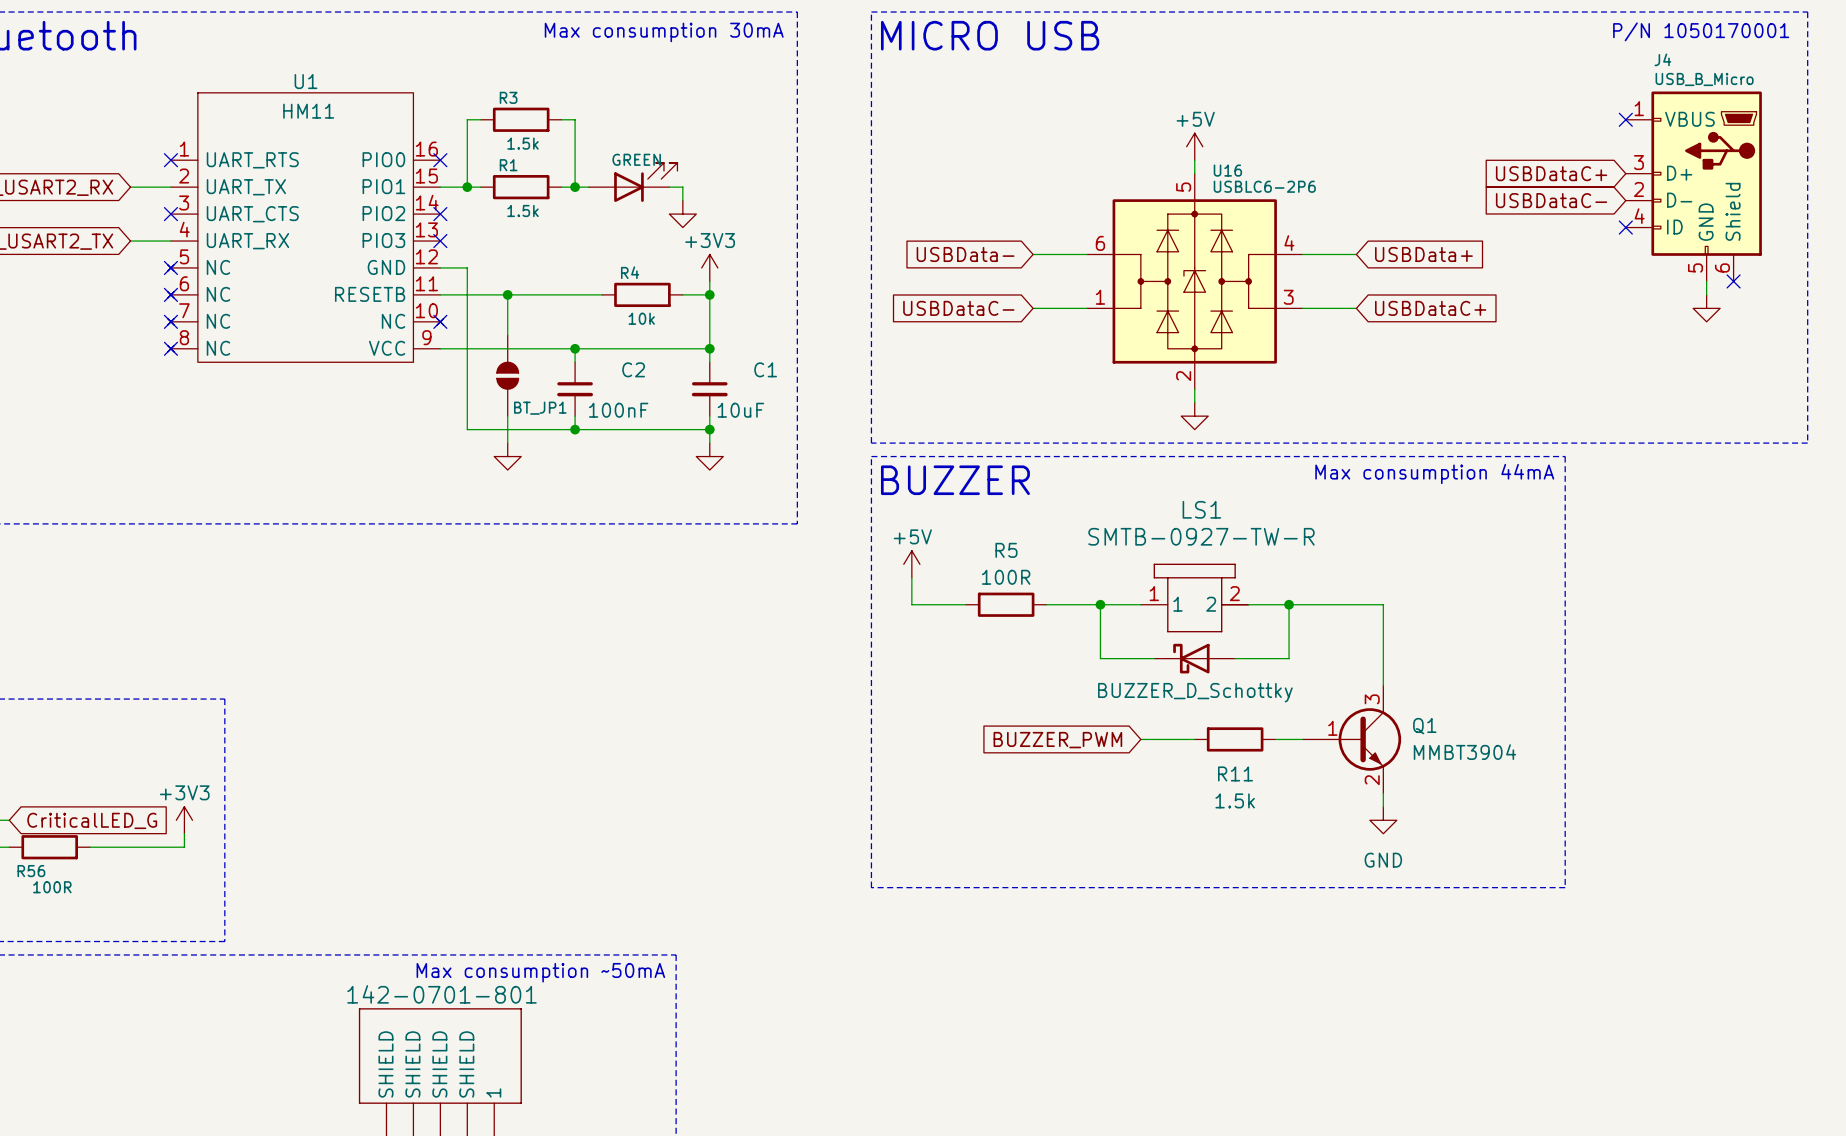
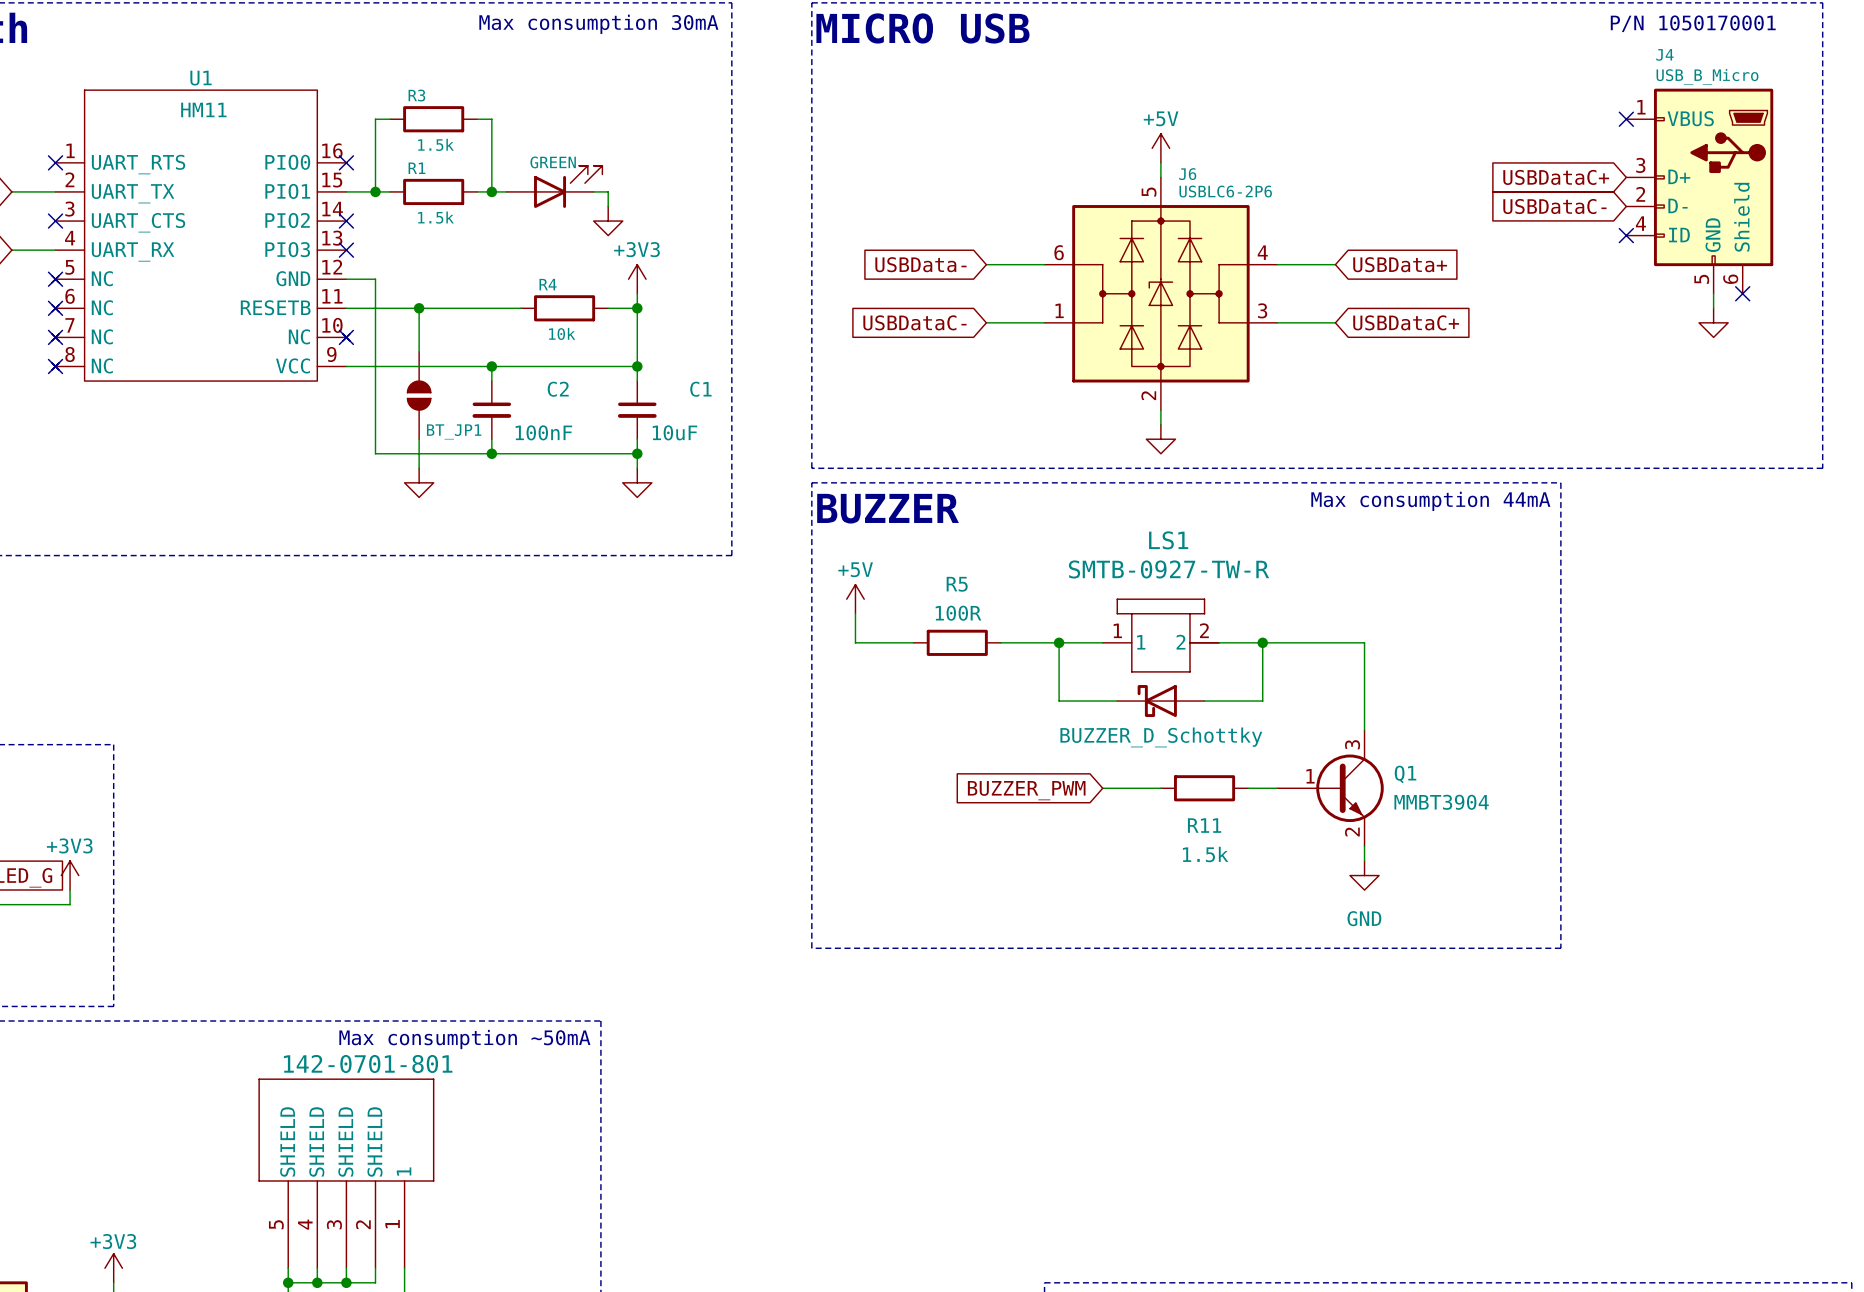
U16 name: U16 (1227, 170) -> J6 (1187, 174)

